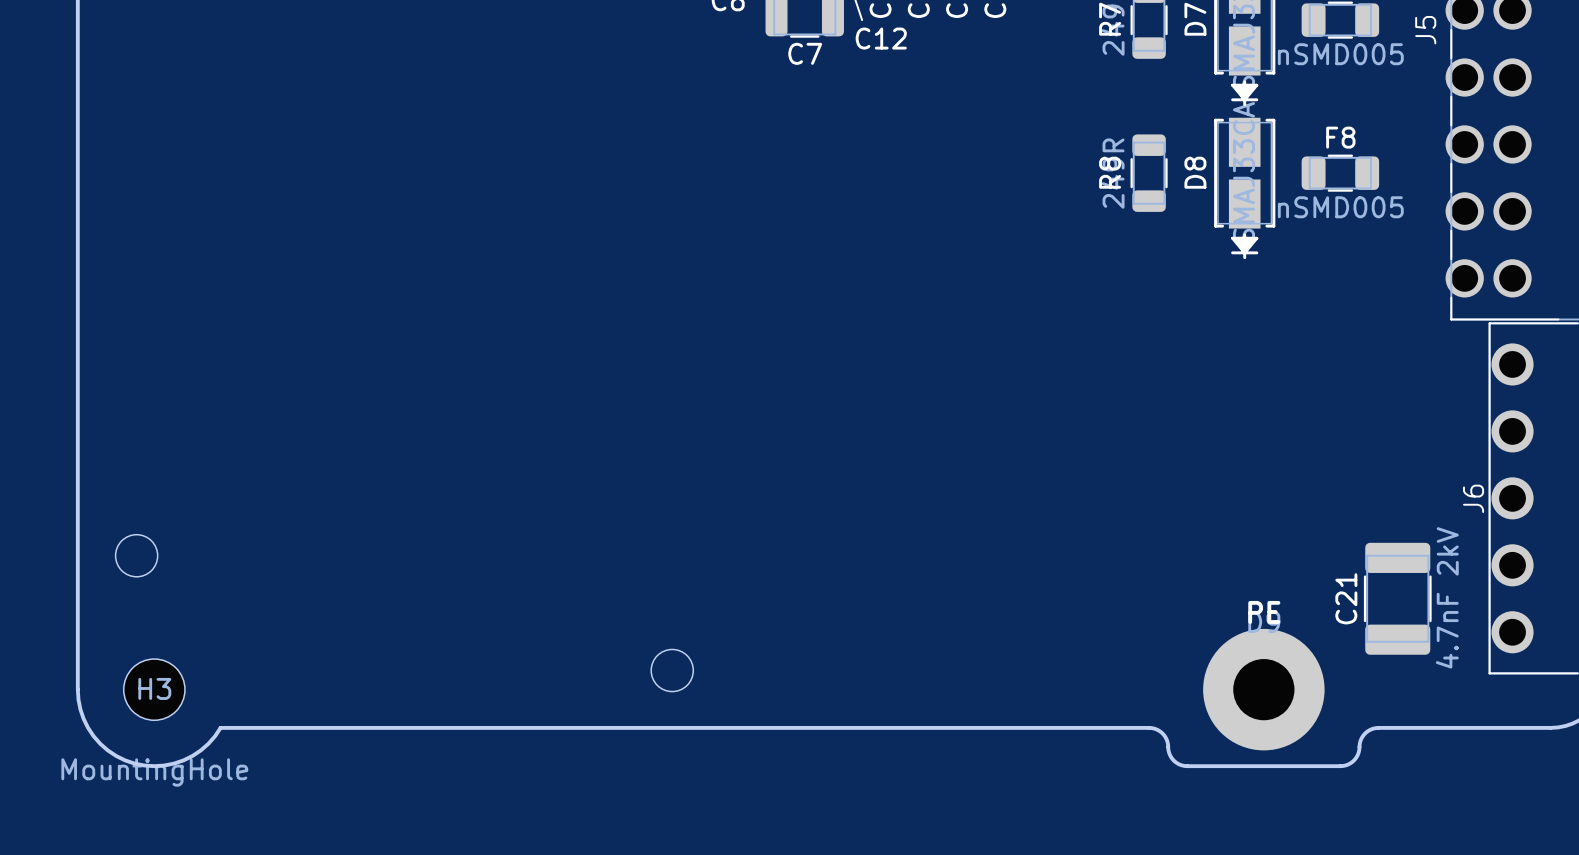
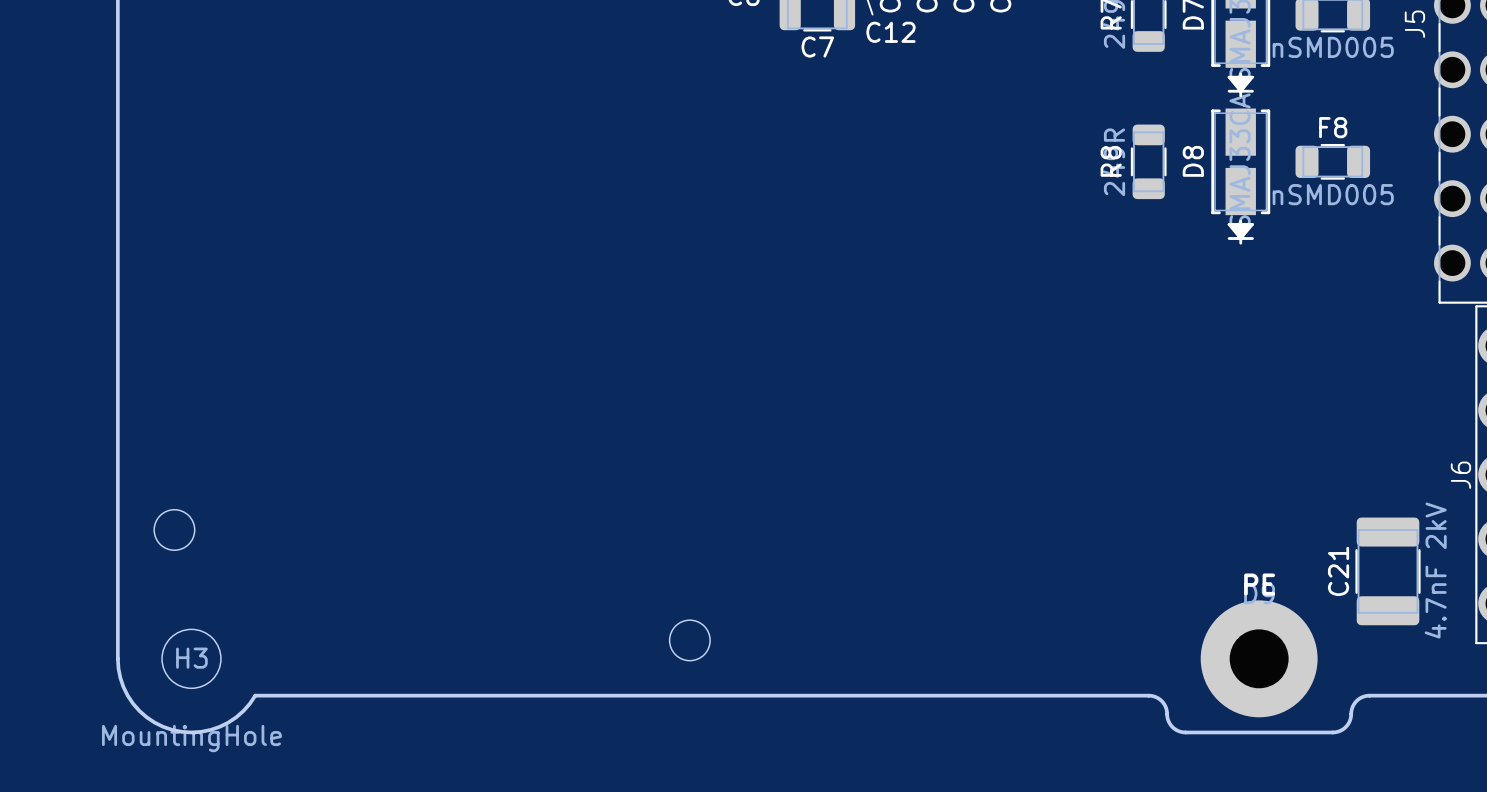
H3 footprint: [123, 659, 185, 721] -> [161, 628, 222, 689]

